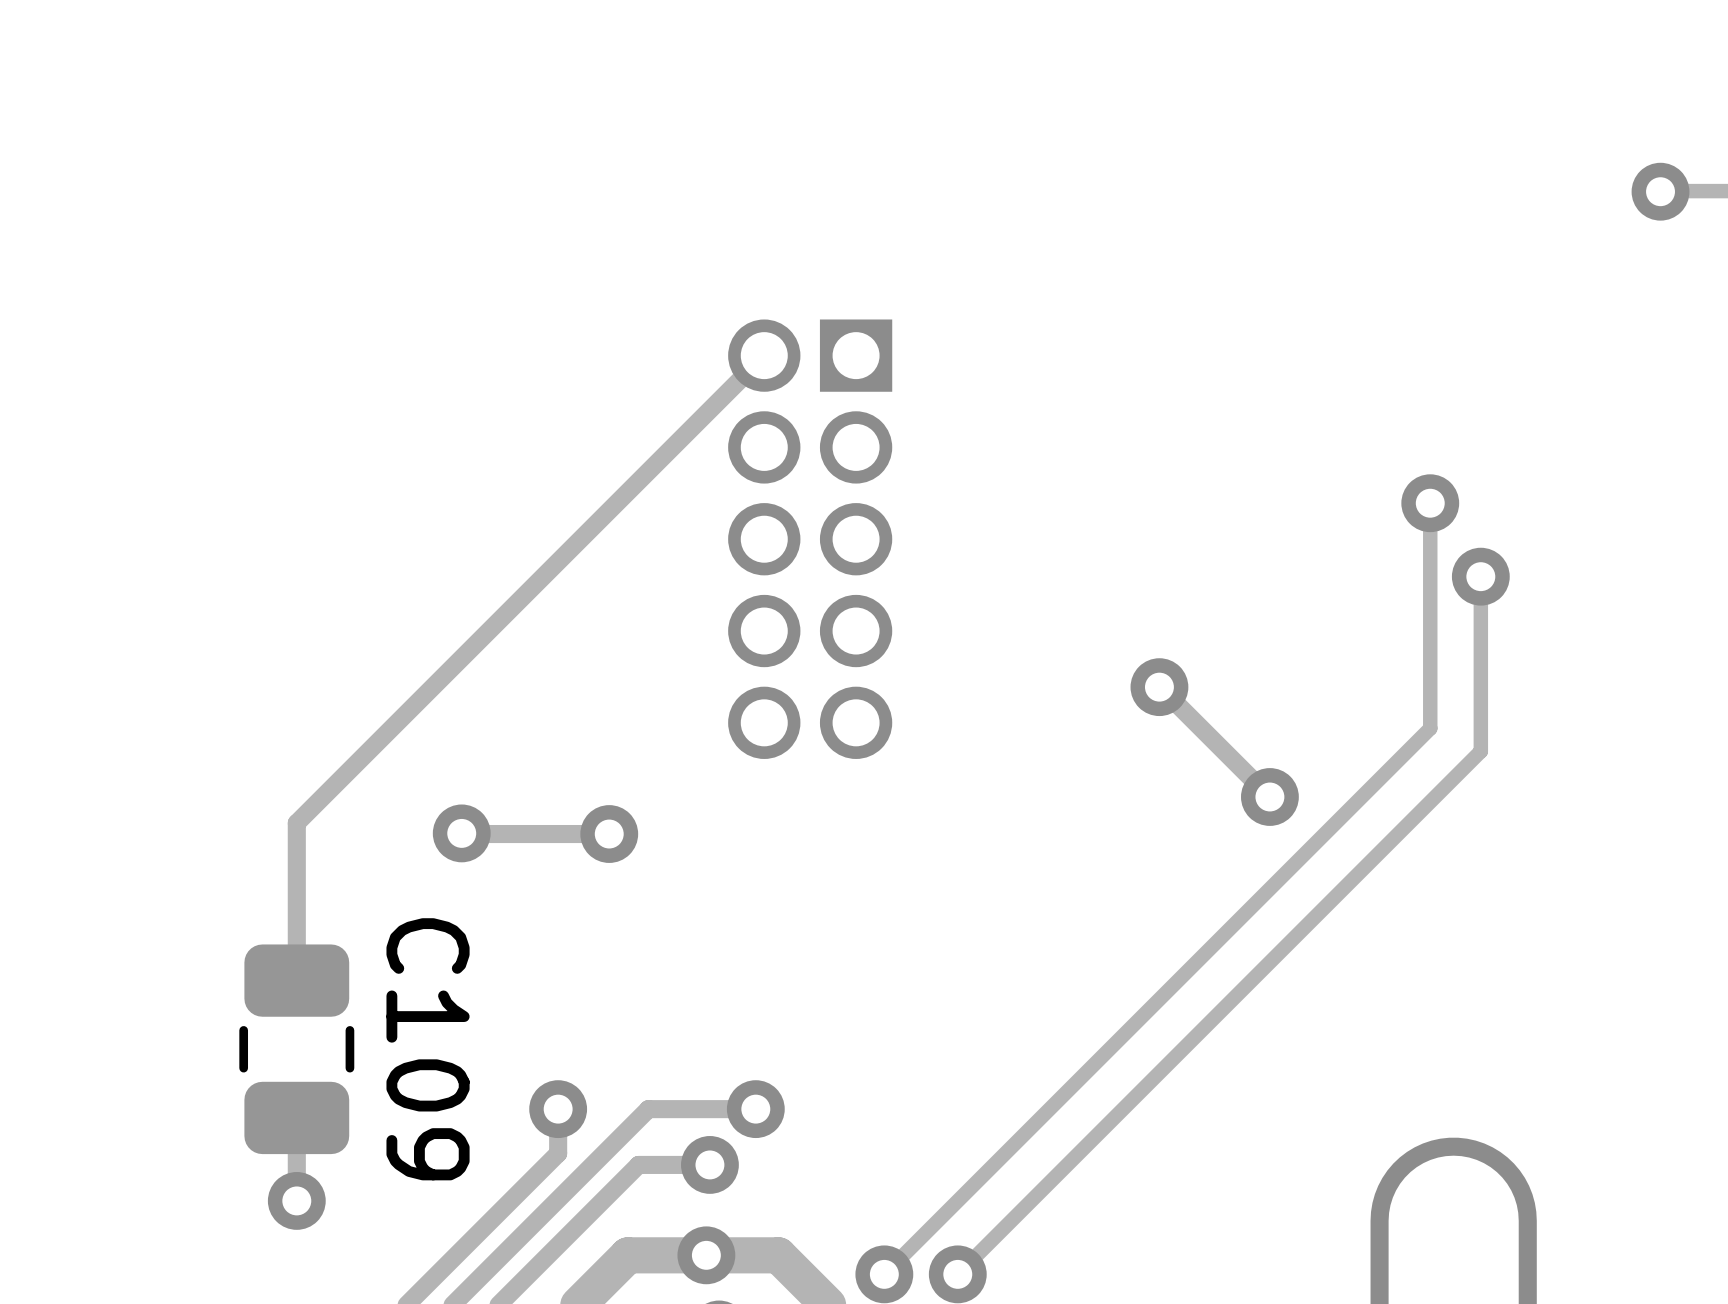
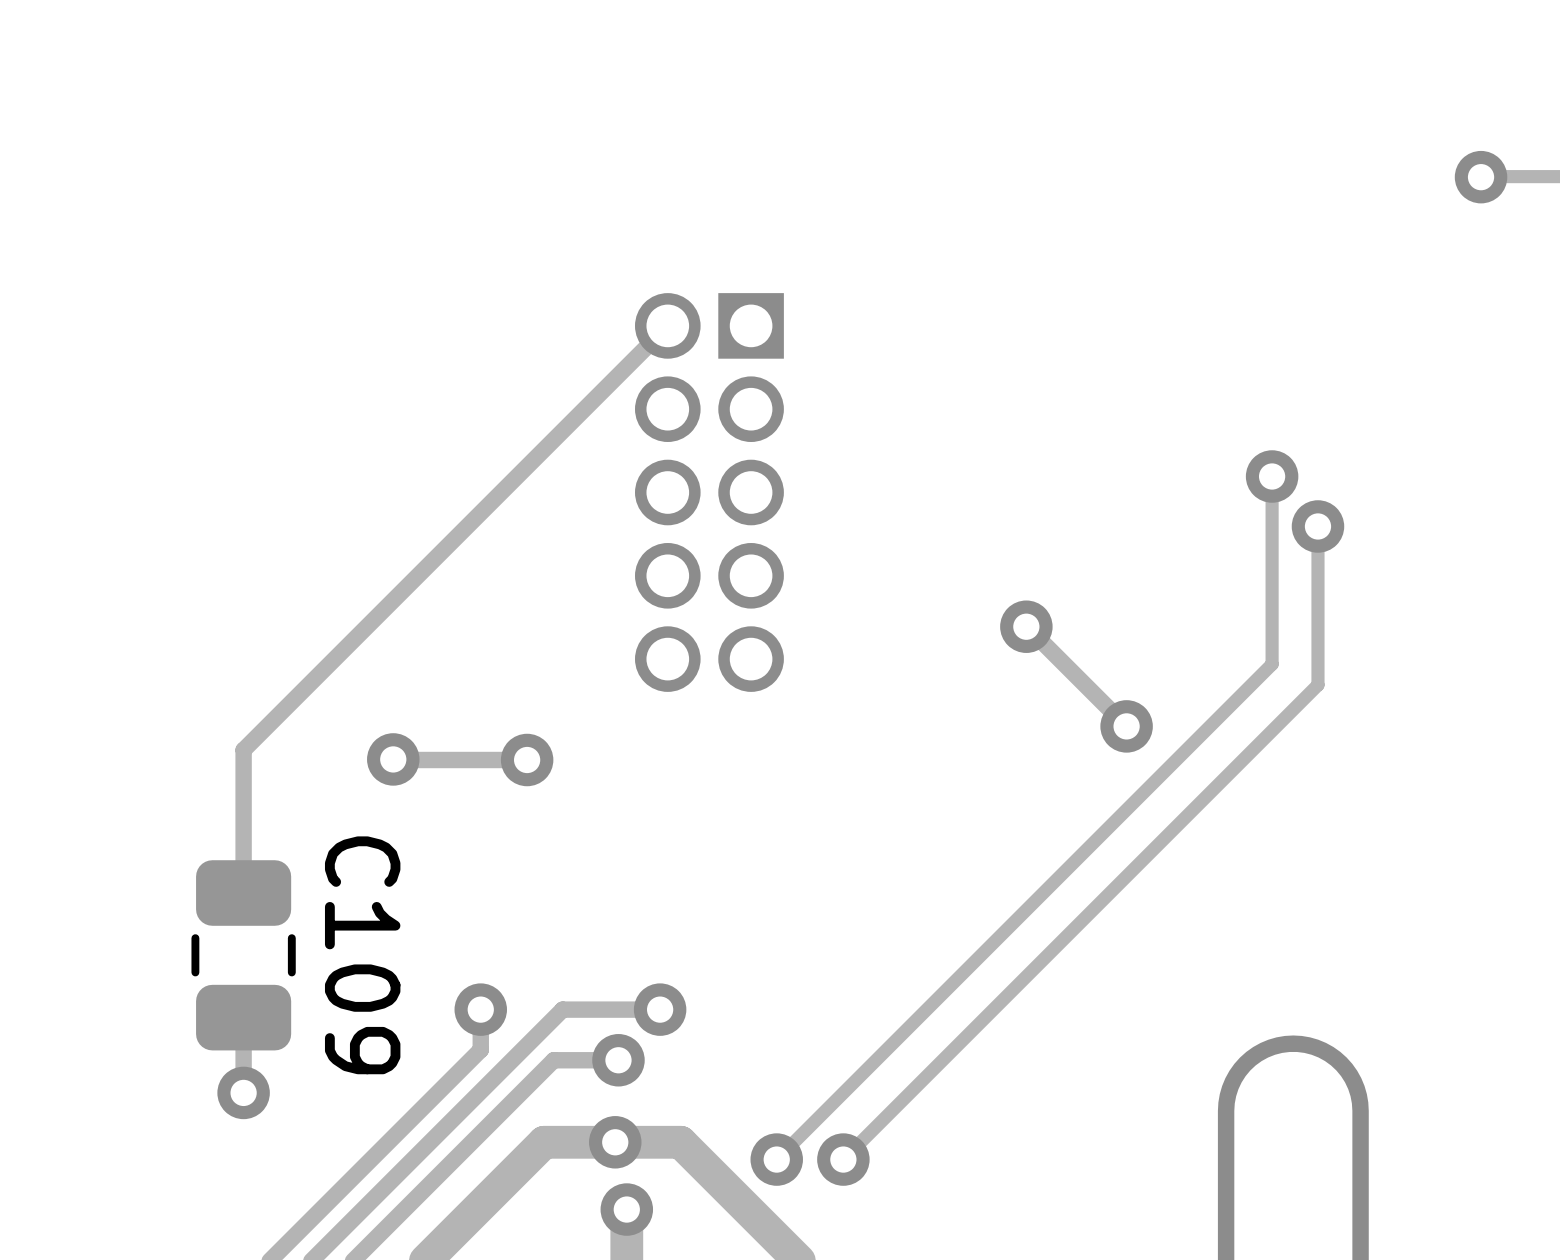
via position: (1430, 503) -> (1272, 476)

